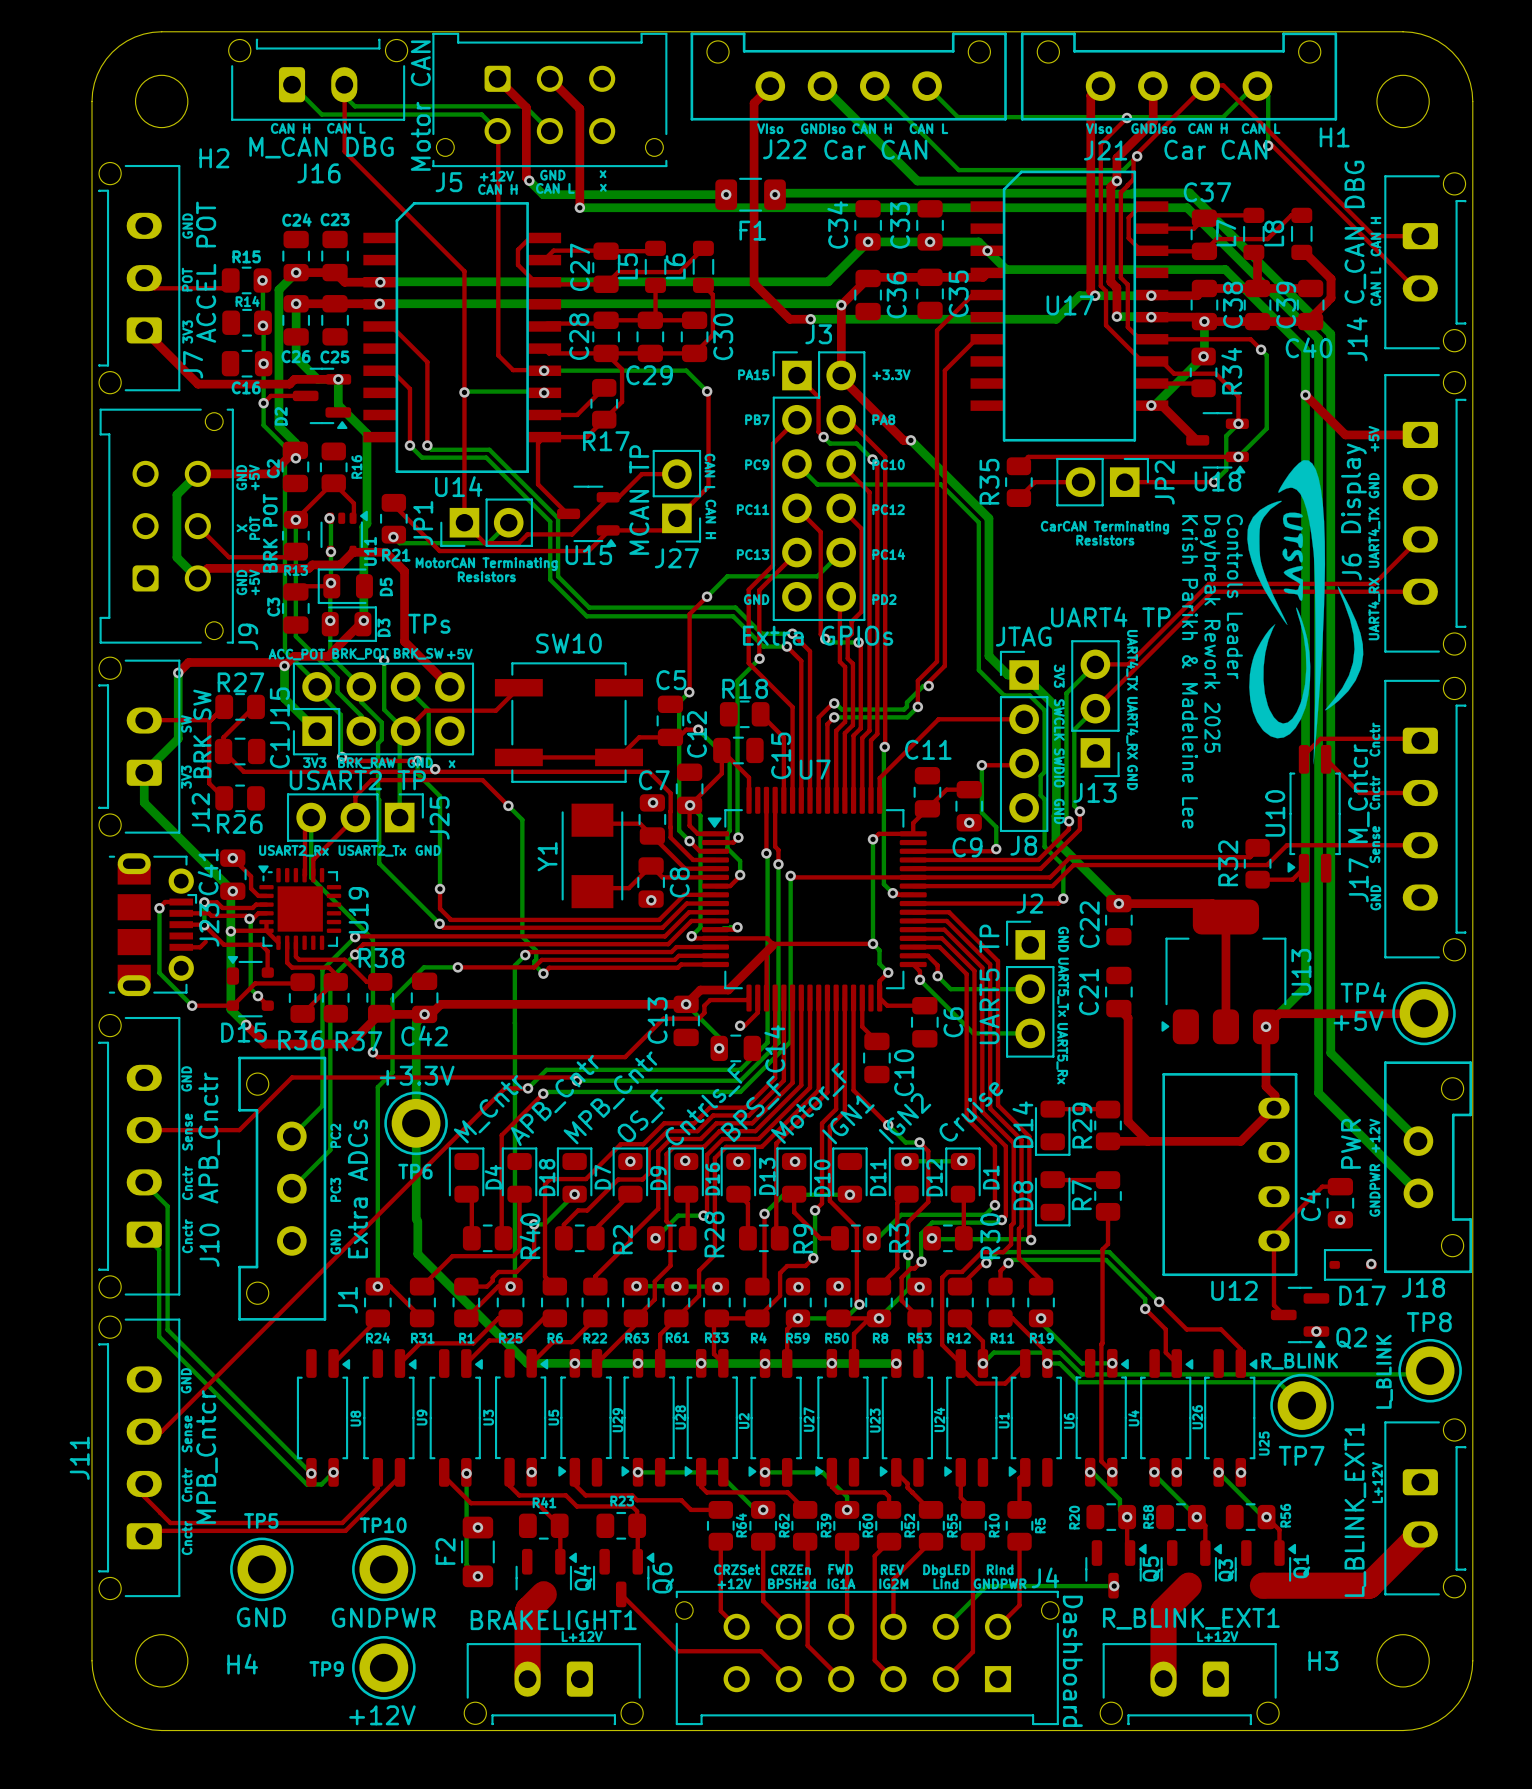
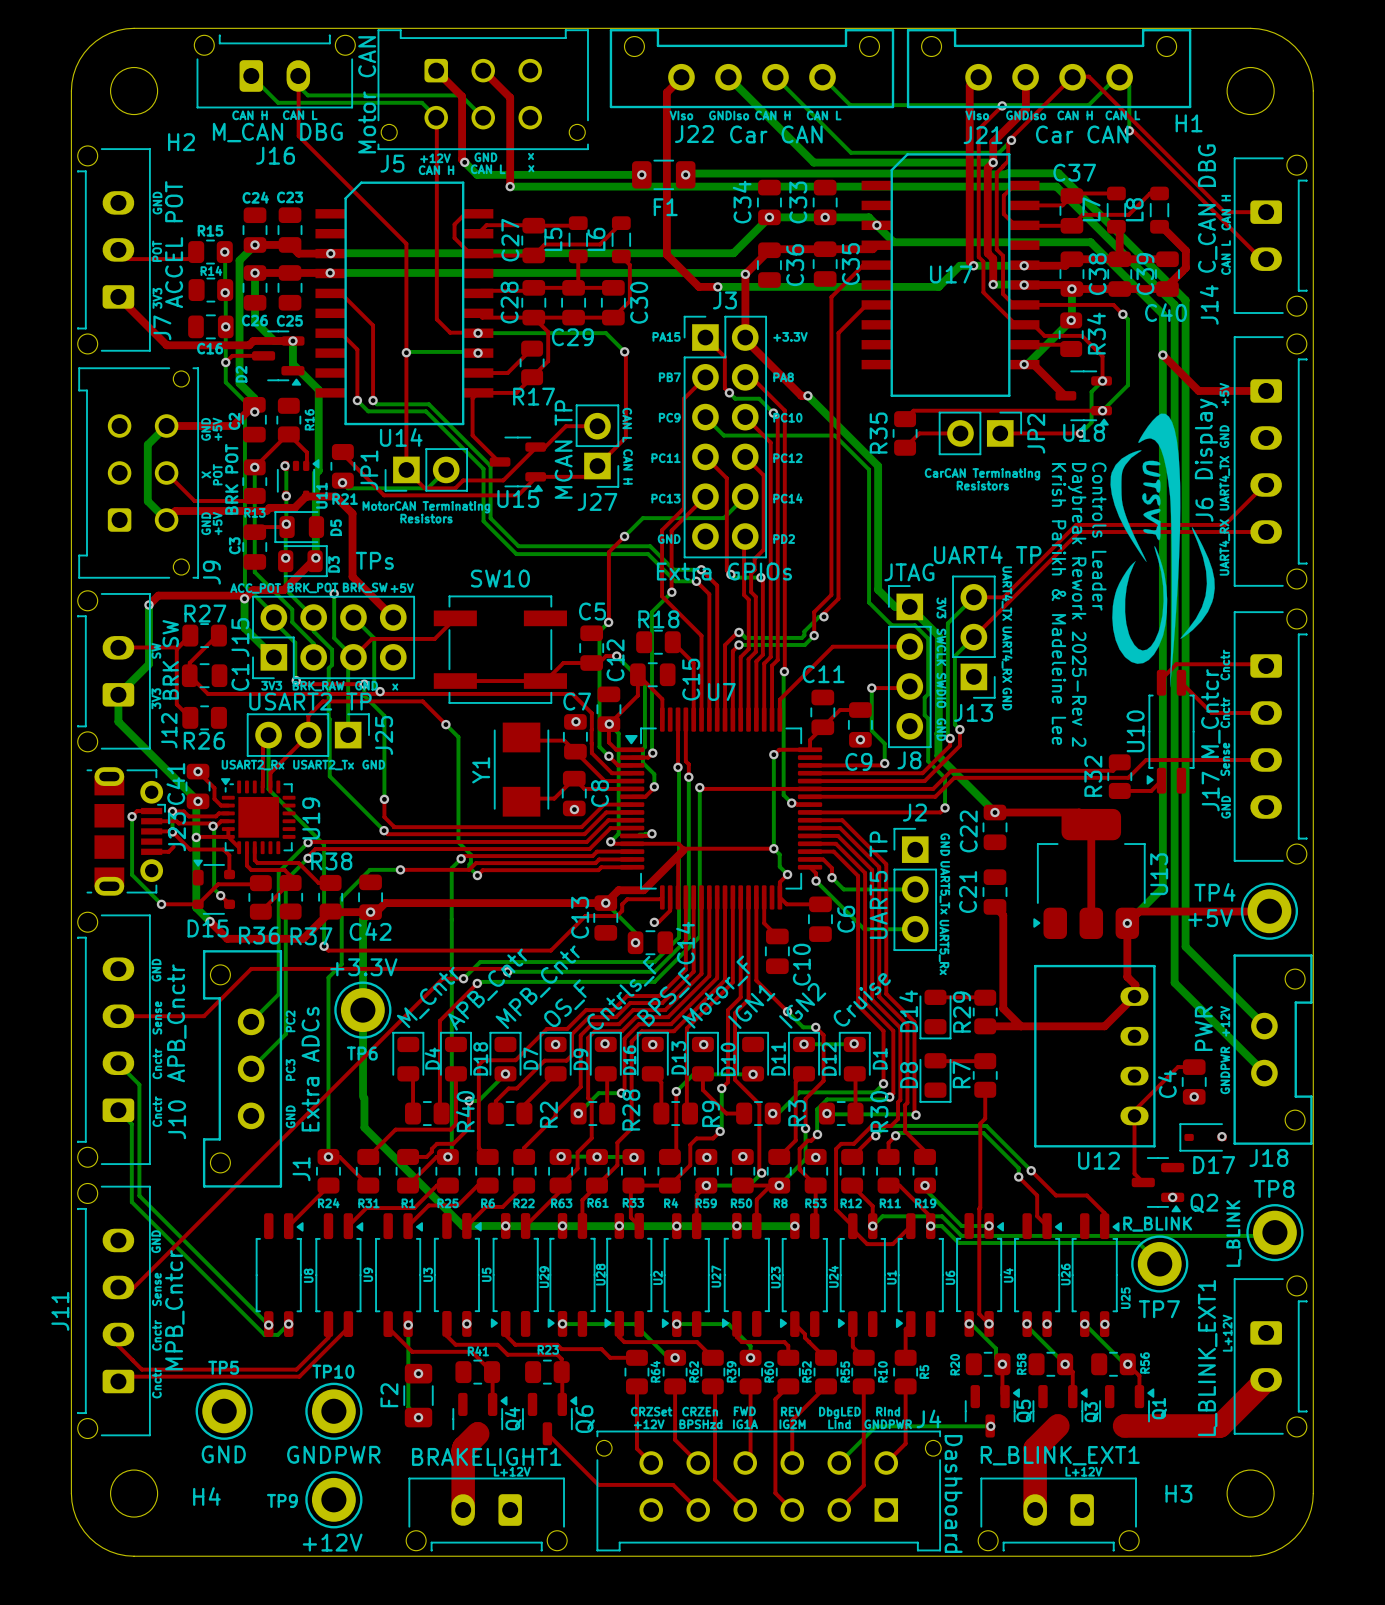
text: Daybreak Rework 2025 (1210, 633) -> Daybreak Rework 2025-Rev 2 (1077, 604)

